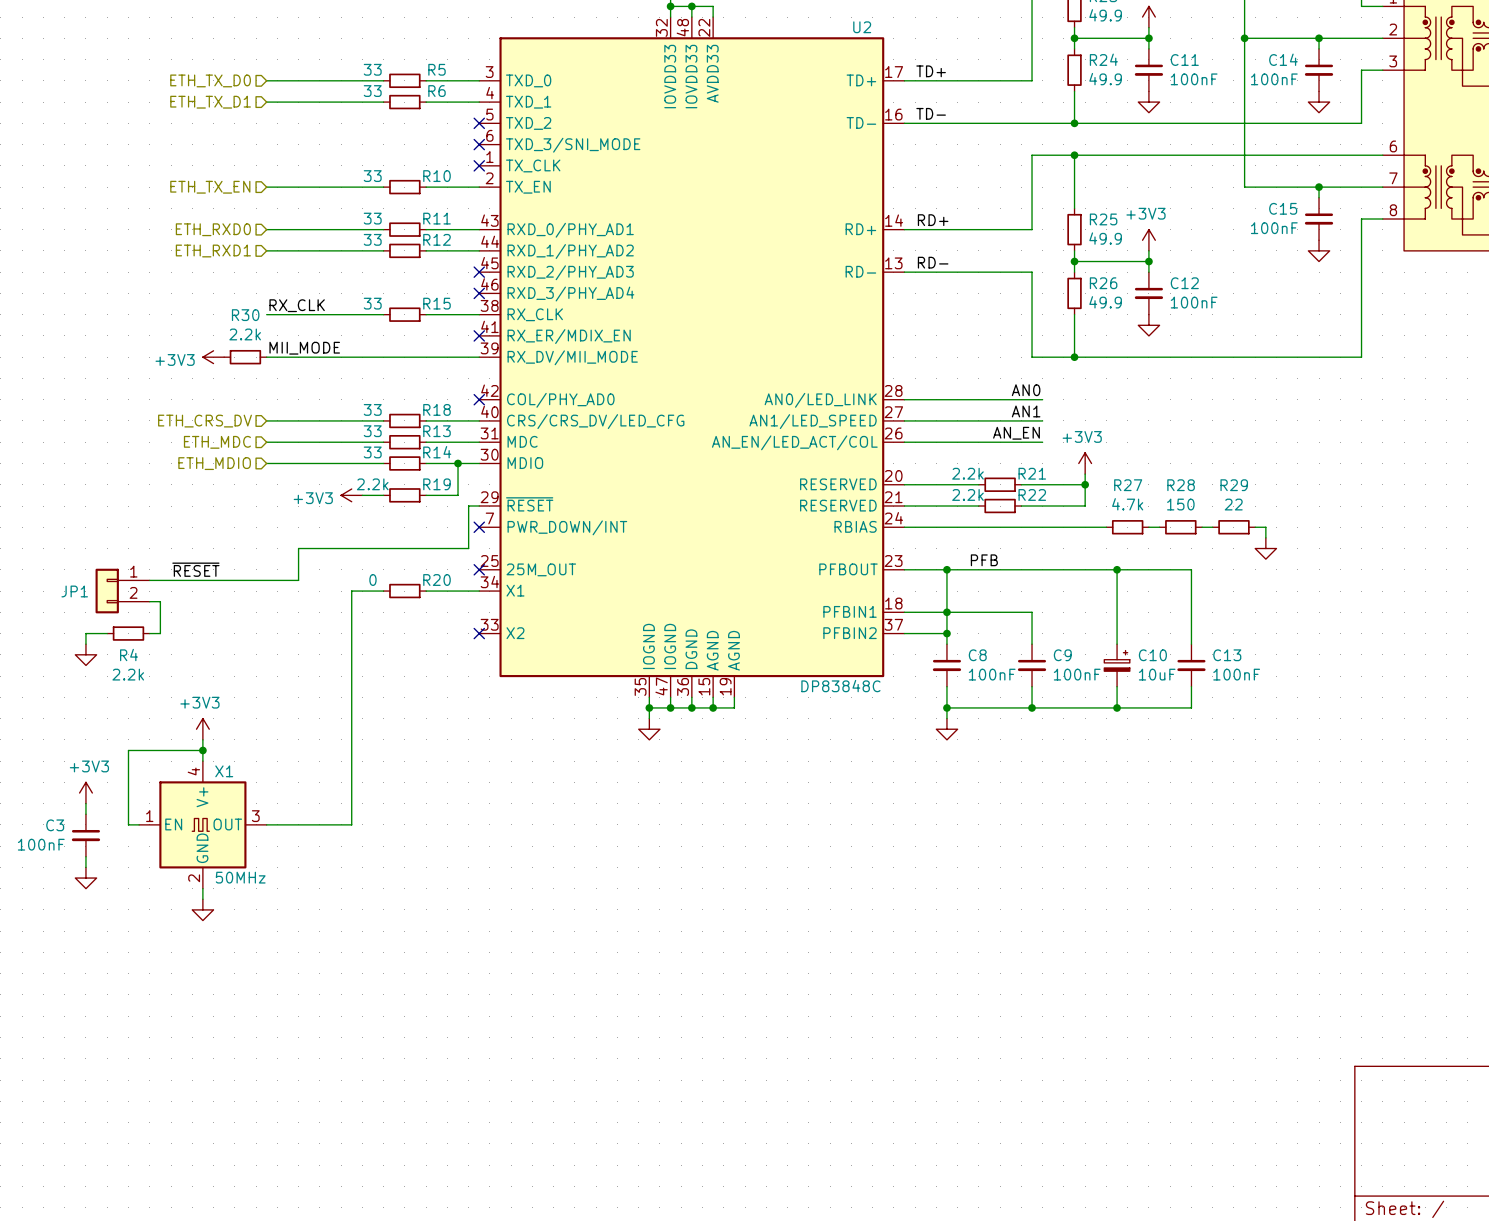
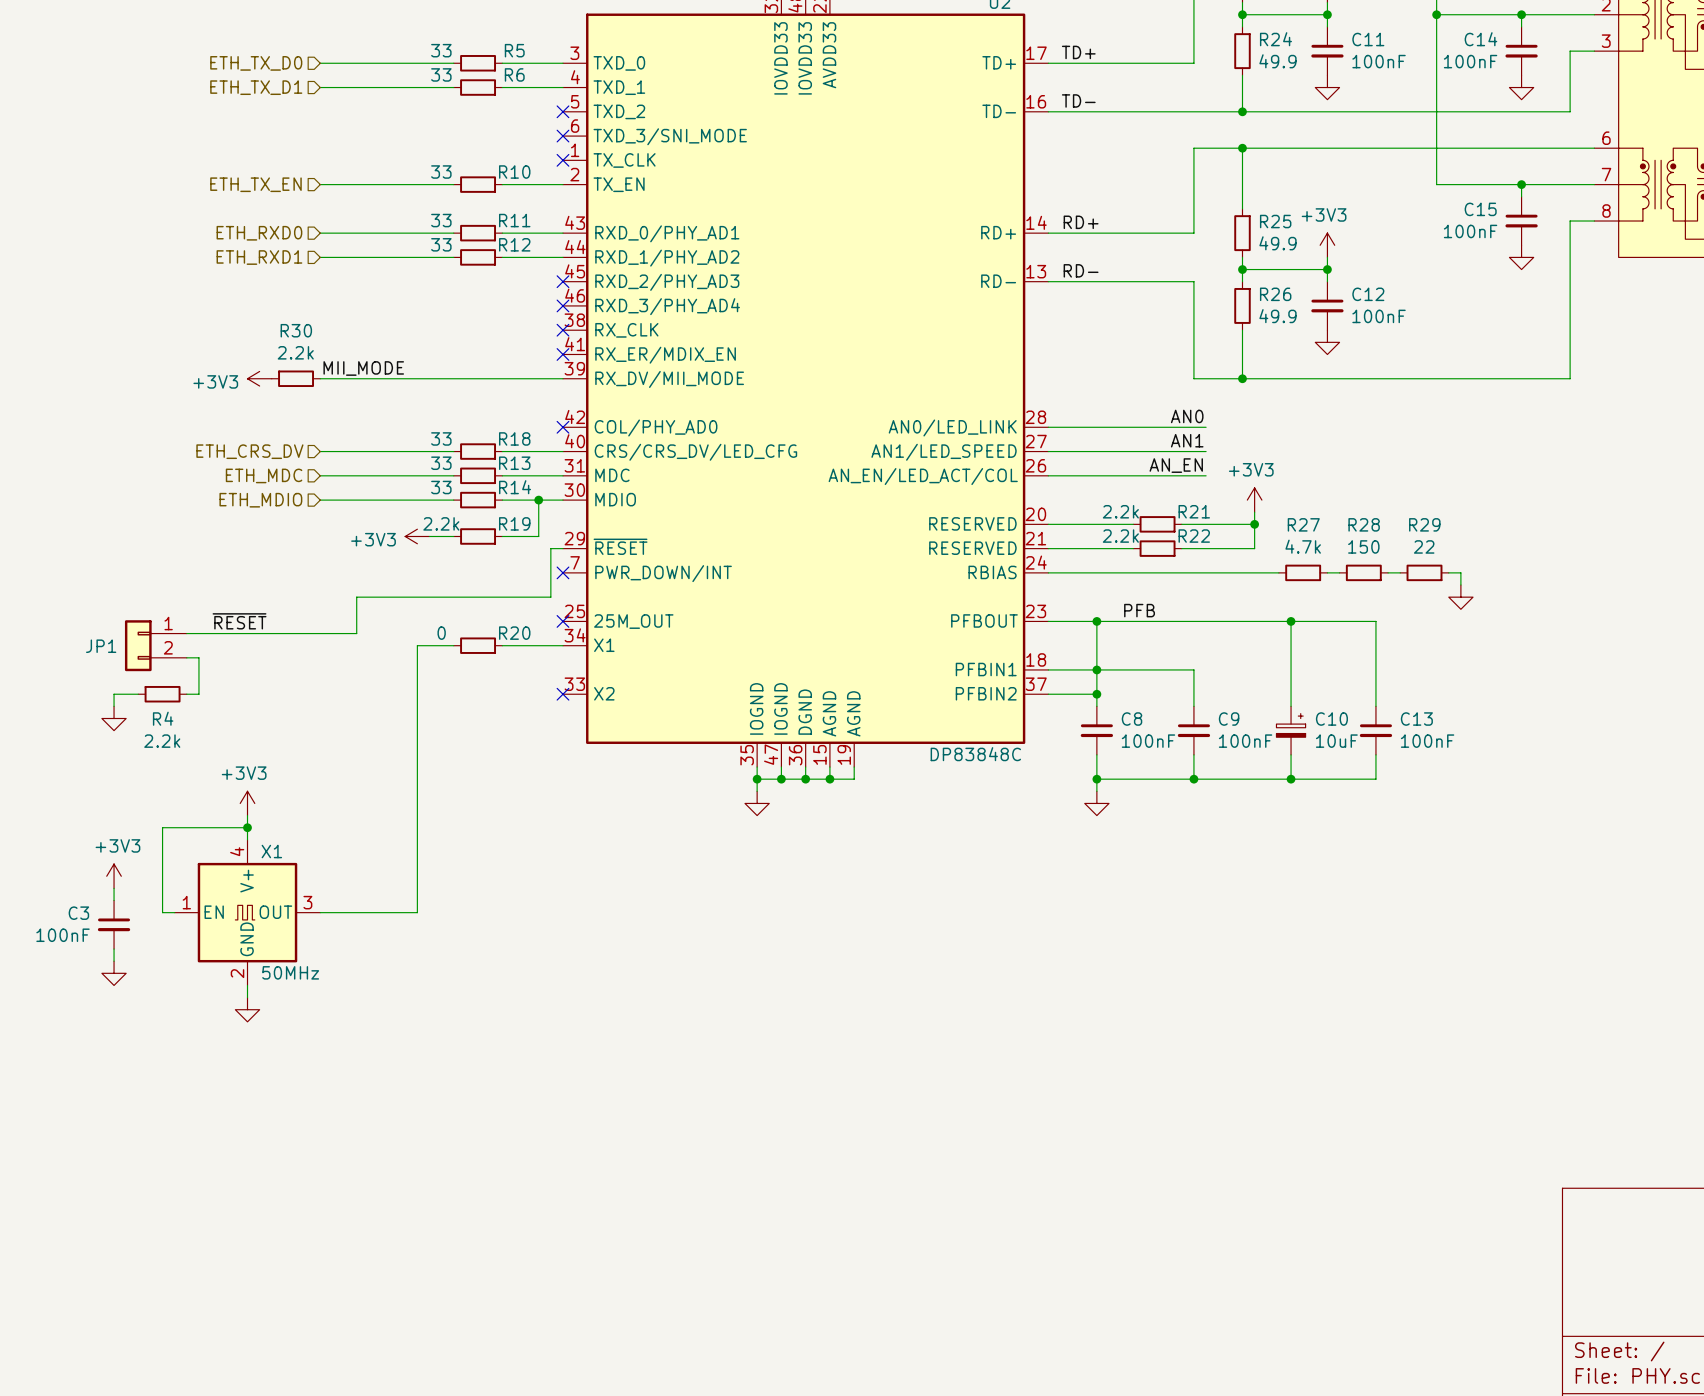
label: RX_CLK (297, 305) -> none
wire: (266, 314) (383, 314) -> none
R15: 33 (404, 314) -> none
wire: (426, 314) (479, 314) -> none
no-connect mark: none -> (562, 330)

